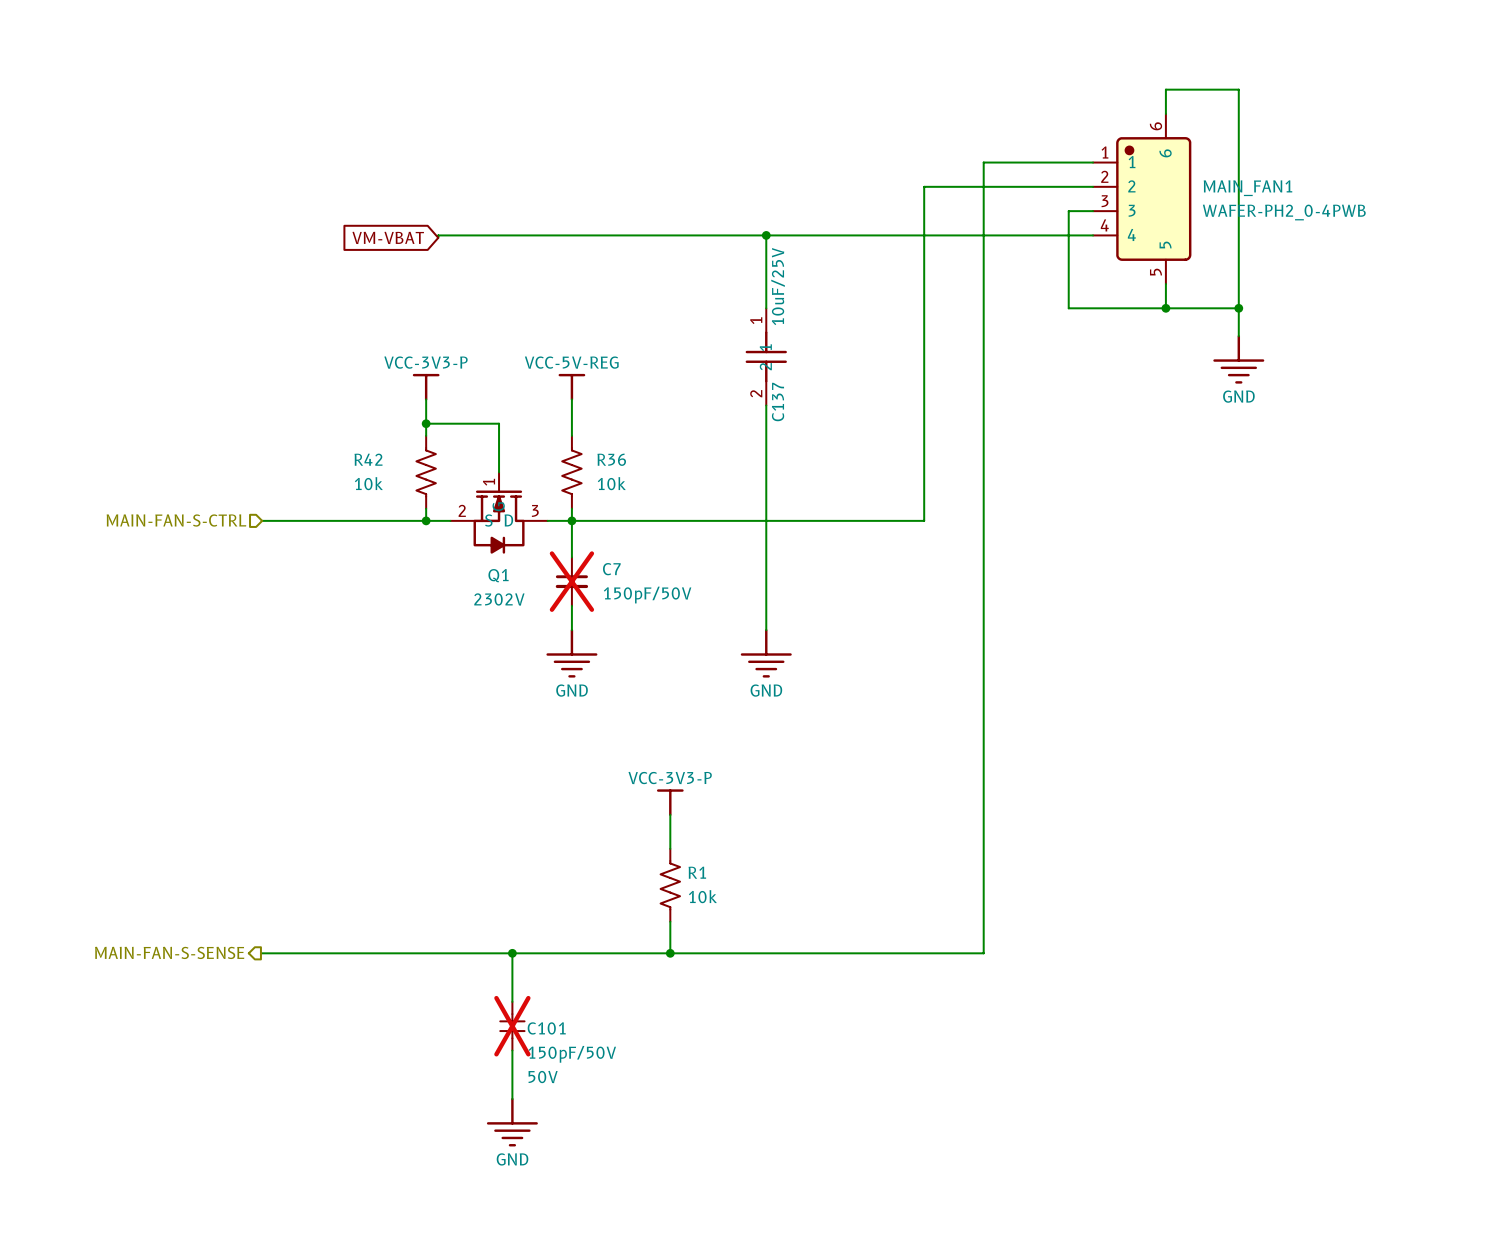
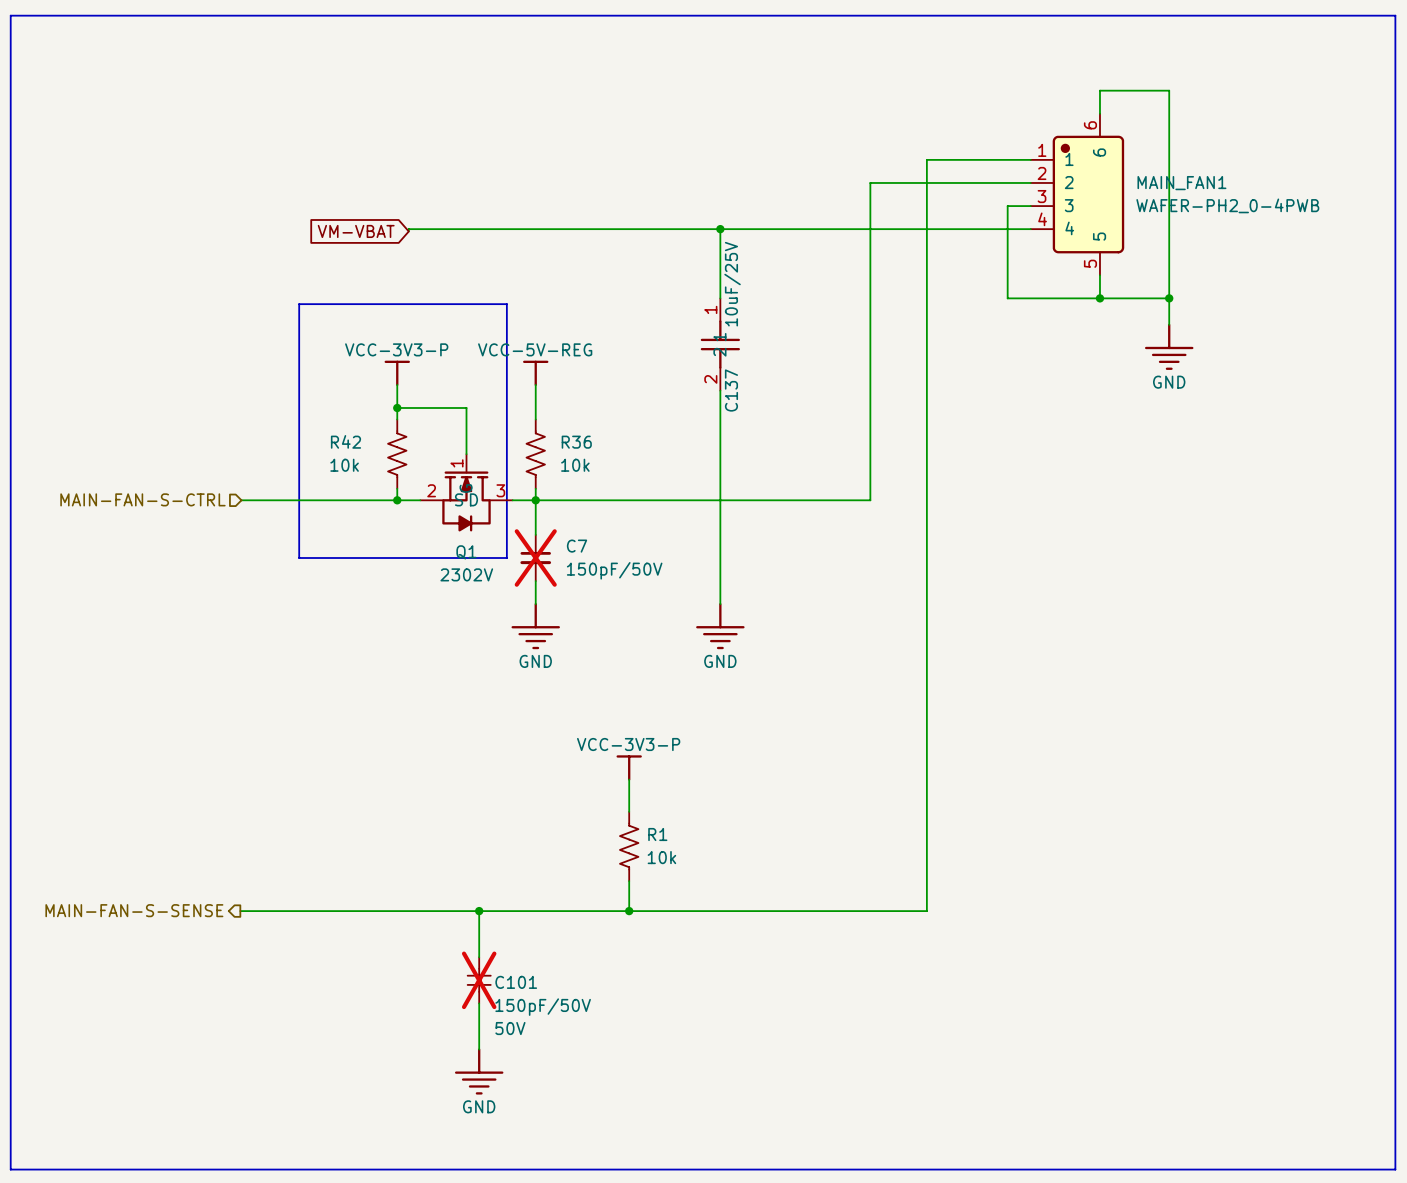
line: none -> (10, 15) (1395, 15) (1395, 1169) (10, 1169) (10, 15)
line: none -> (299, 304) (506, 304) (506, 558) (299, 558) (299, 304)

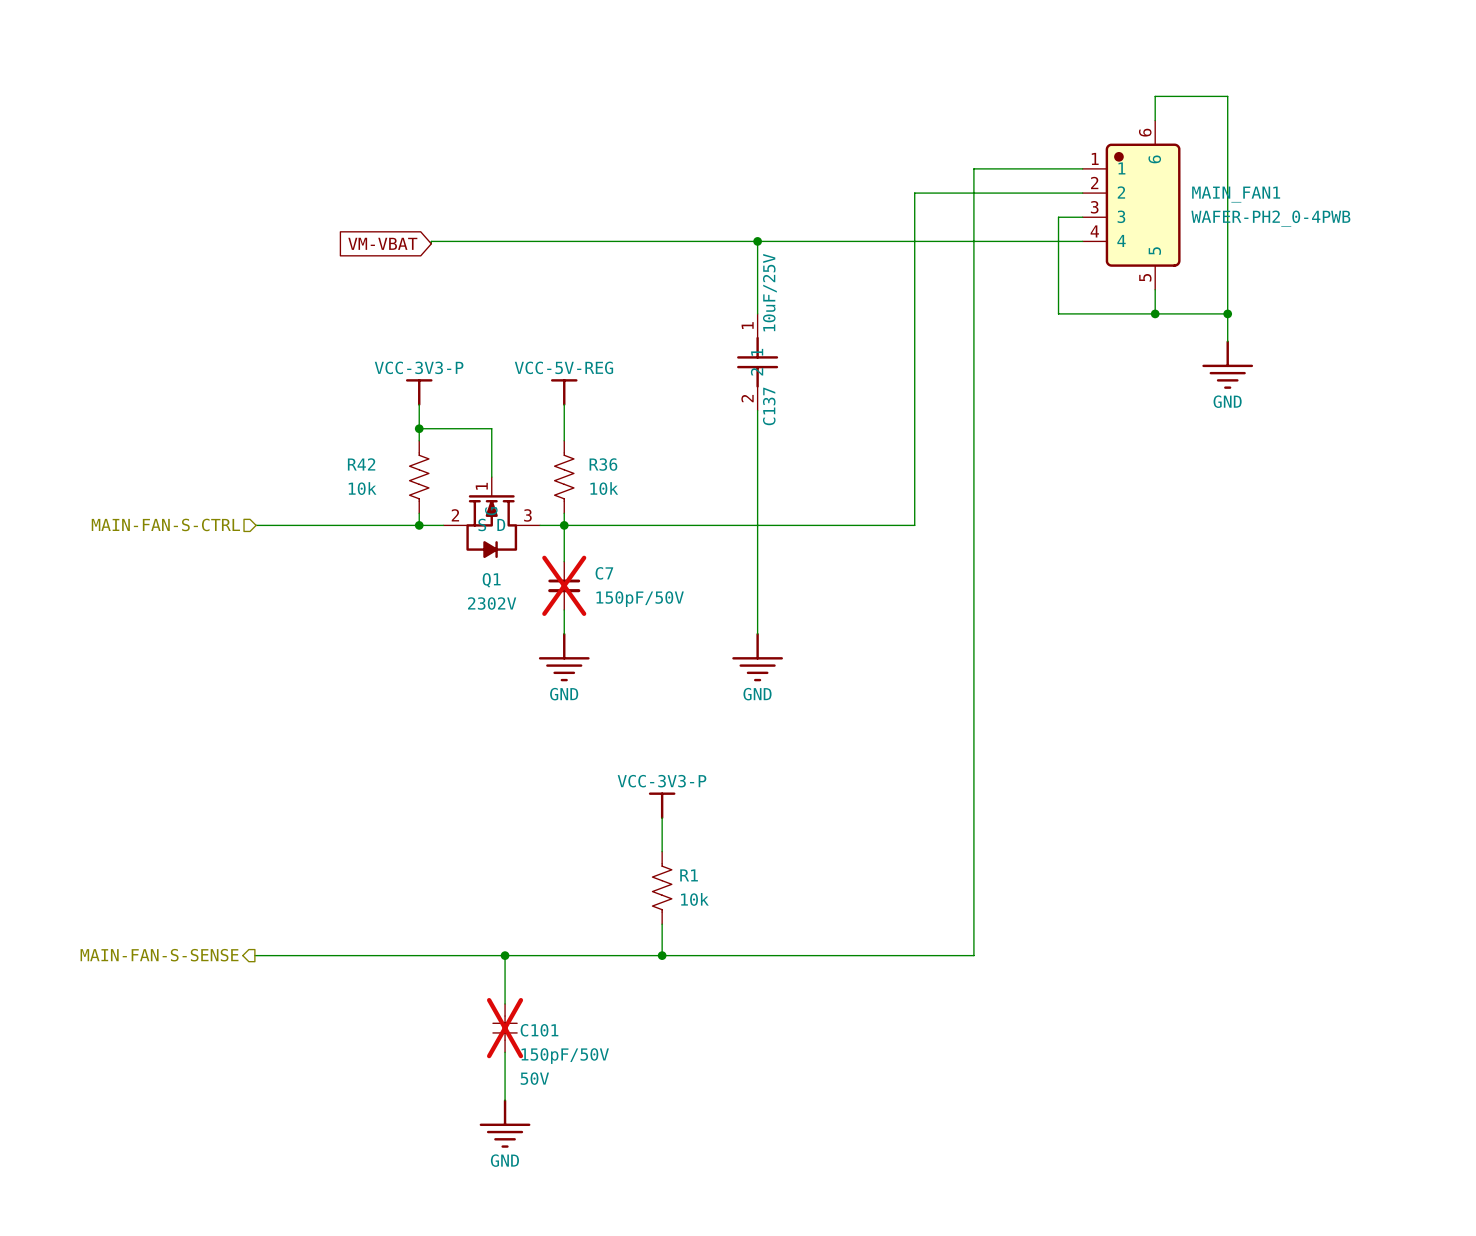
line: (10, 15) (1395, 15) (1395, 1169) (10, 1169) (10, 15) -> none
line: (299, 304) (506, 304) (506, 558) (299, 558) (299, 304) -> none

